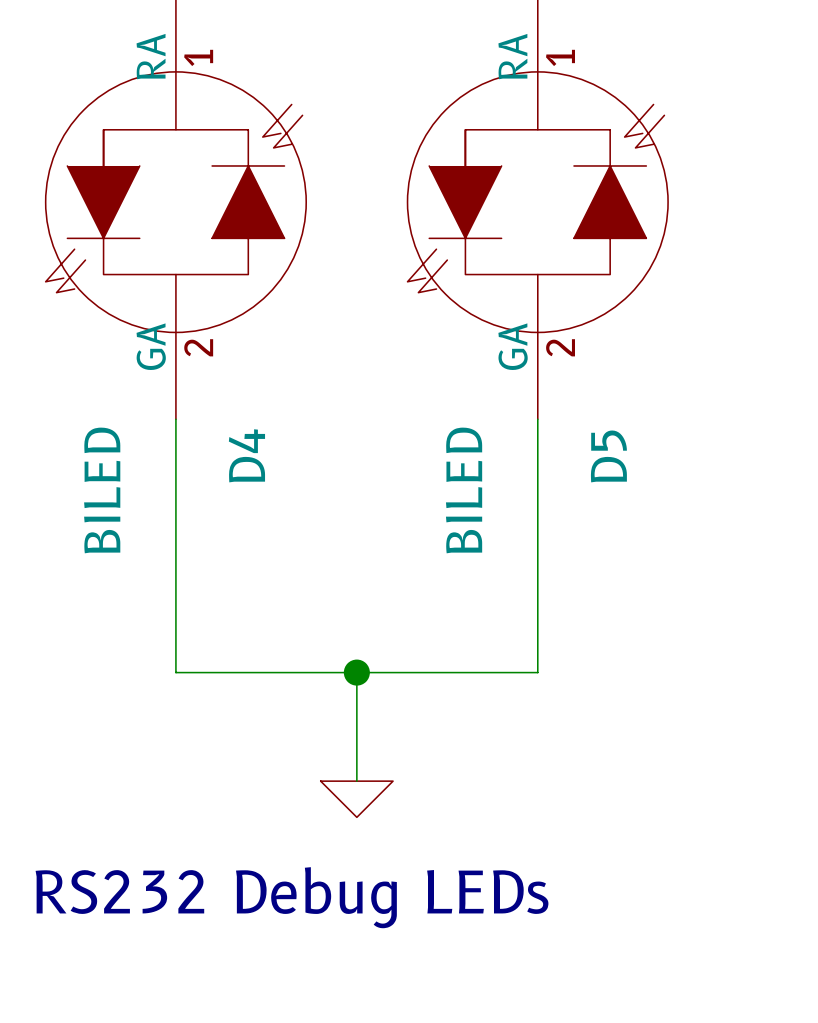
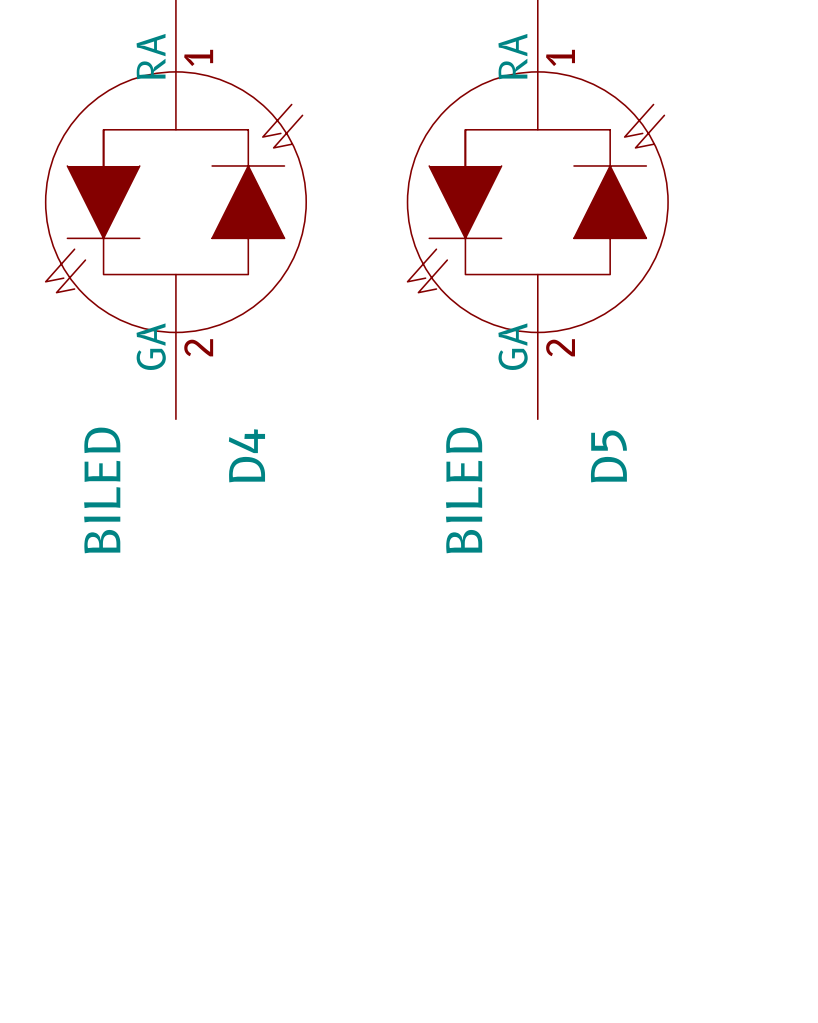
wire: (175, 419) (175, 672) (537, 672) (537, 419) -> none
wire: (356, 672) (356, 781) -> none
junction: (356, 672) -> none
power symbol: (356, 799) -> none
text: RS232 Debug LEDs (292, 897) -> none

